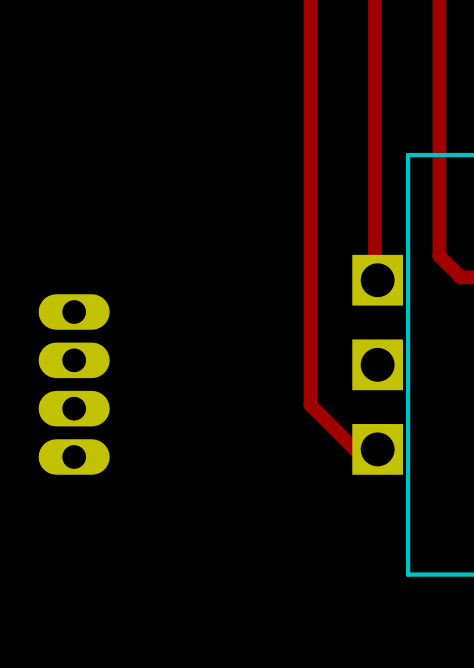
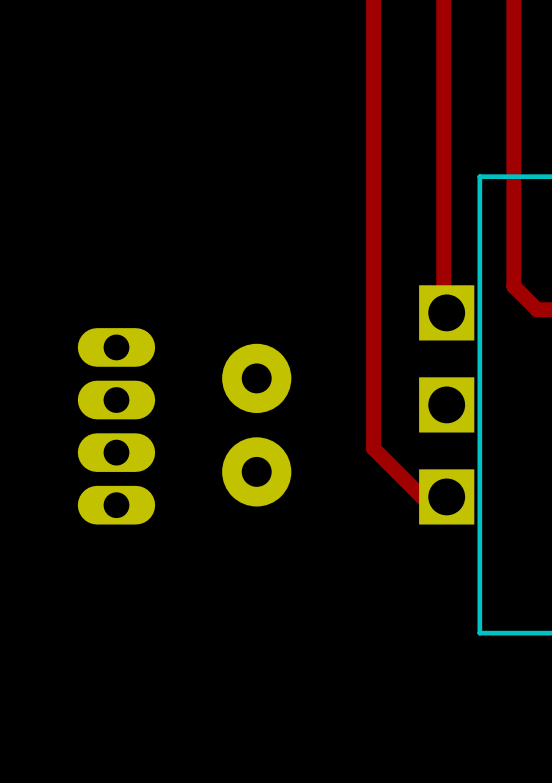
part: none -> (256, 425)

